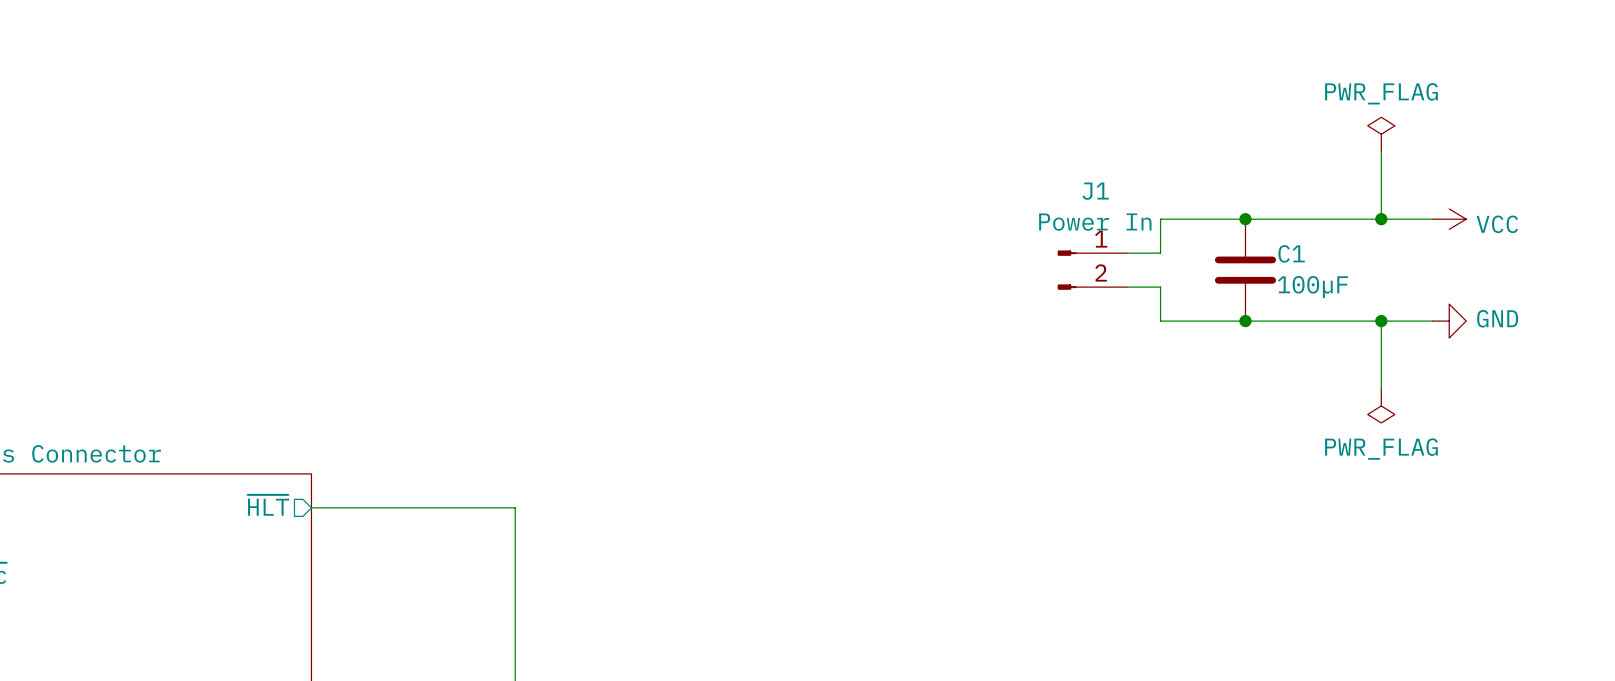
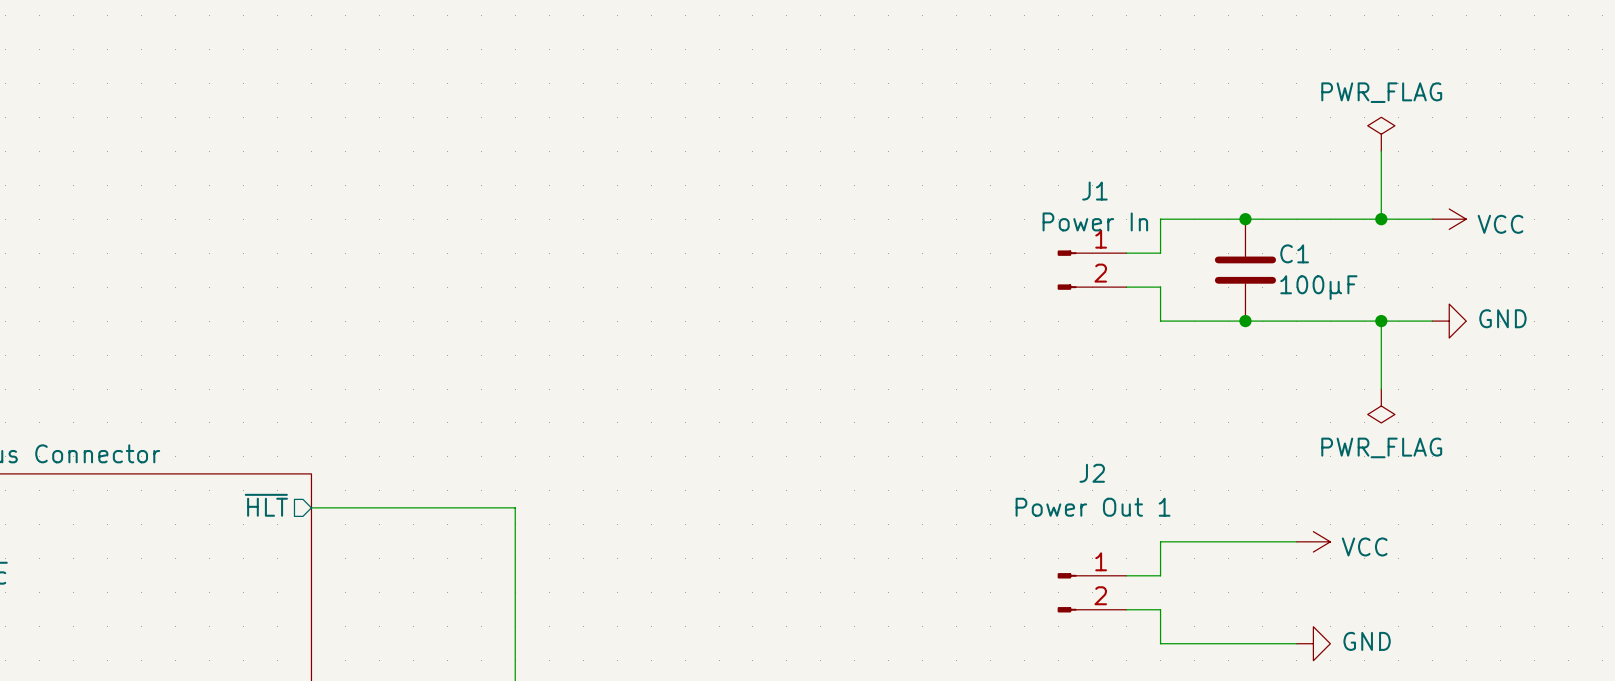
wire: none -> (1296, 541) (1160, 541) (1160, 575) (1126, 575)
power symbol: none -> VCC (1313, 541)
J2: none -> Power Out 1 (1092, 592)
wire: none -> (1126, 609) (1160, 609) (1160, 643) (1296, 643)
power symbol: none -> GND (1313, 643)

